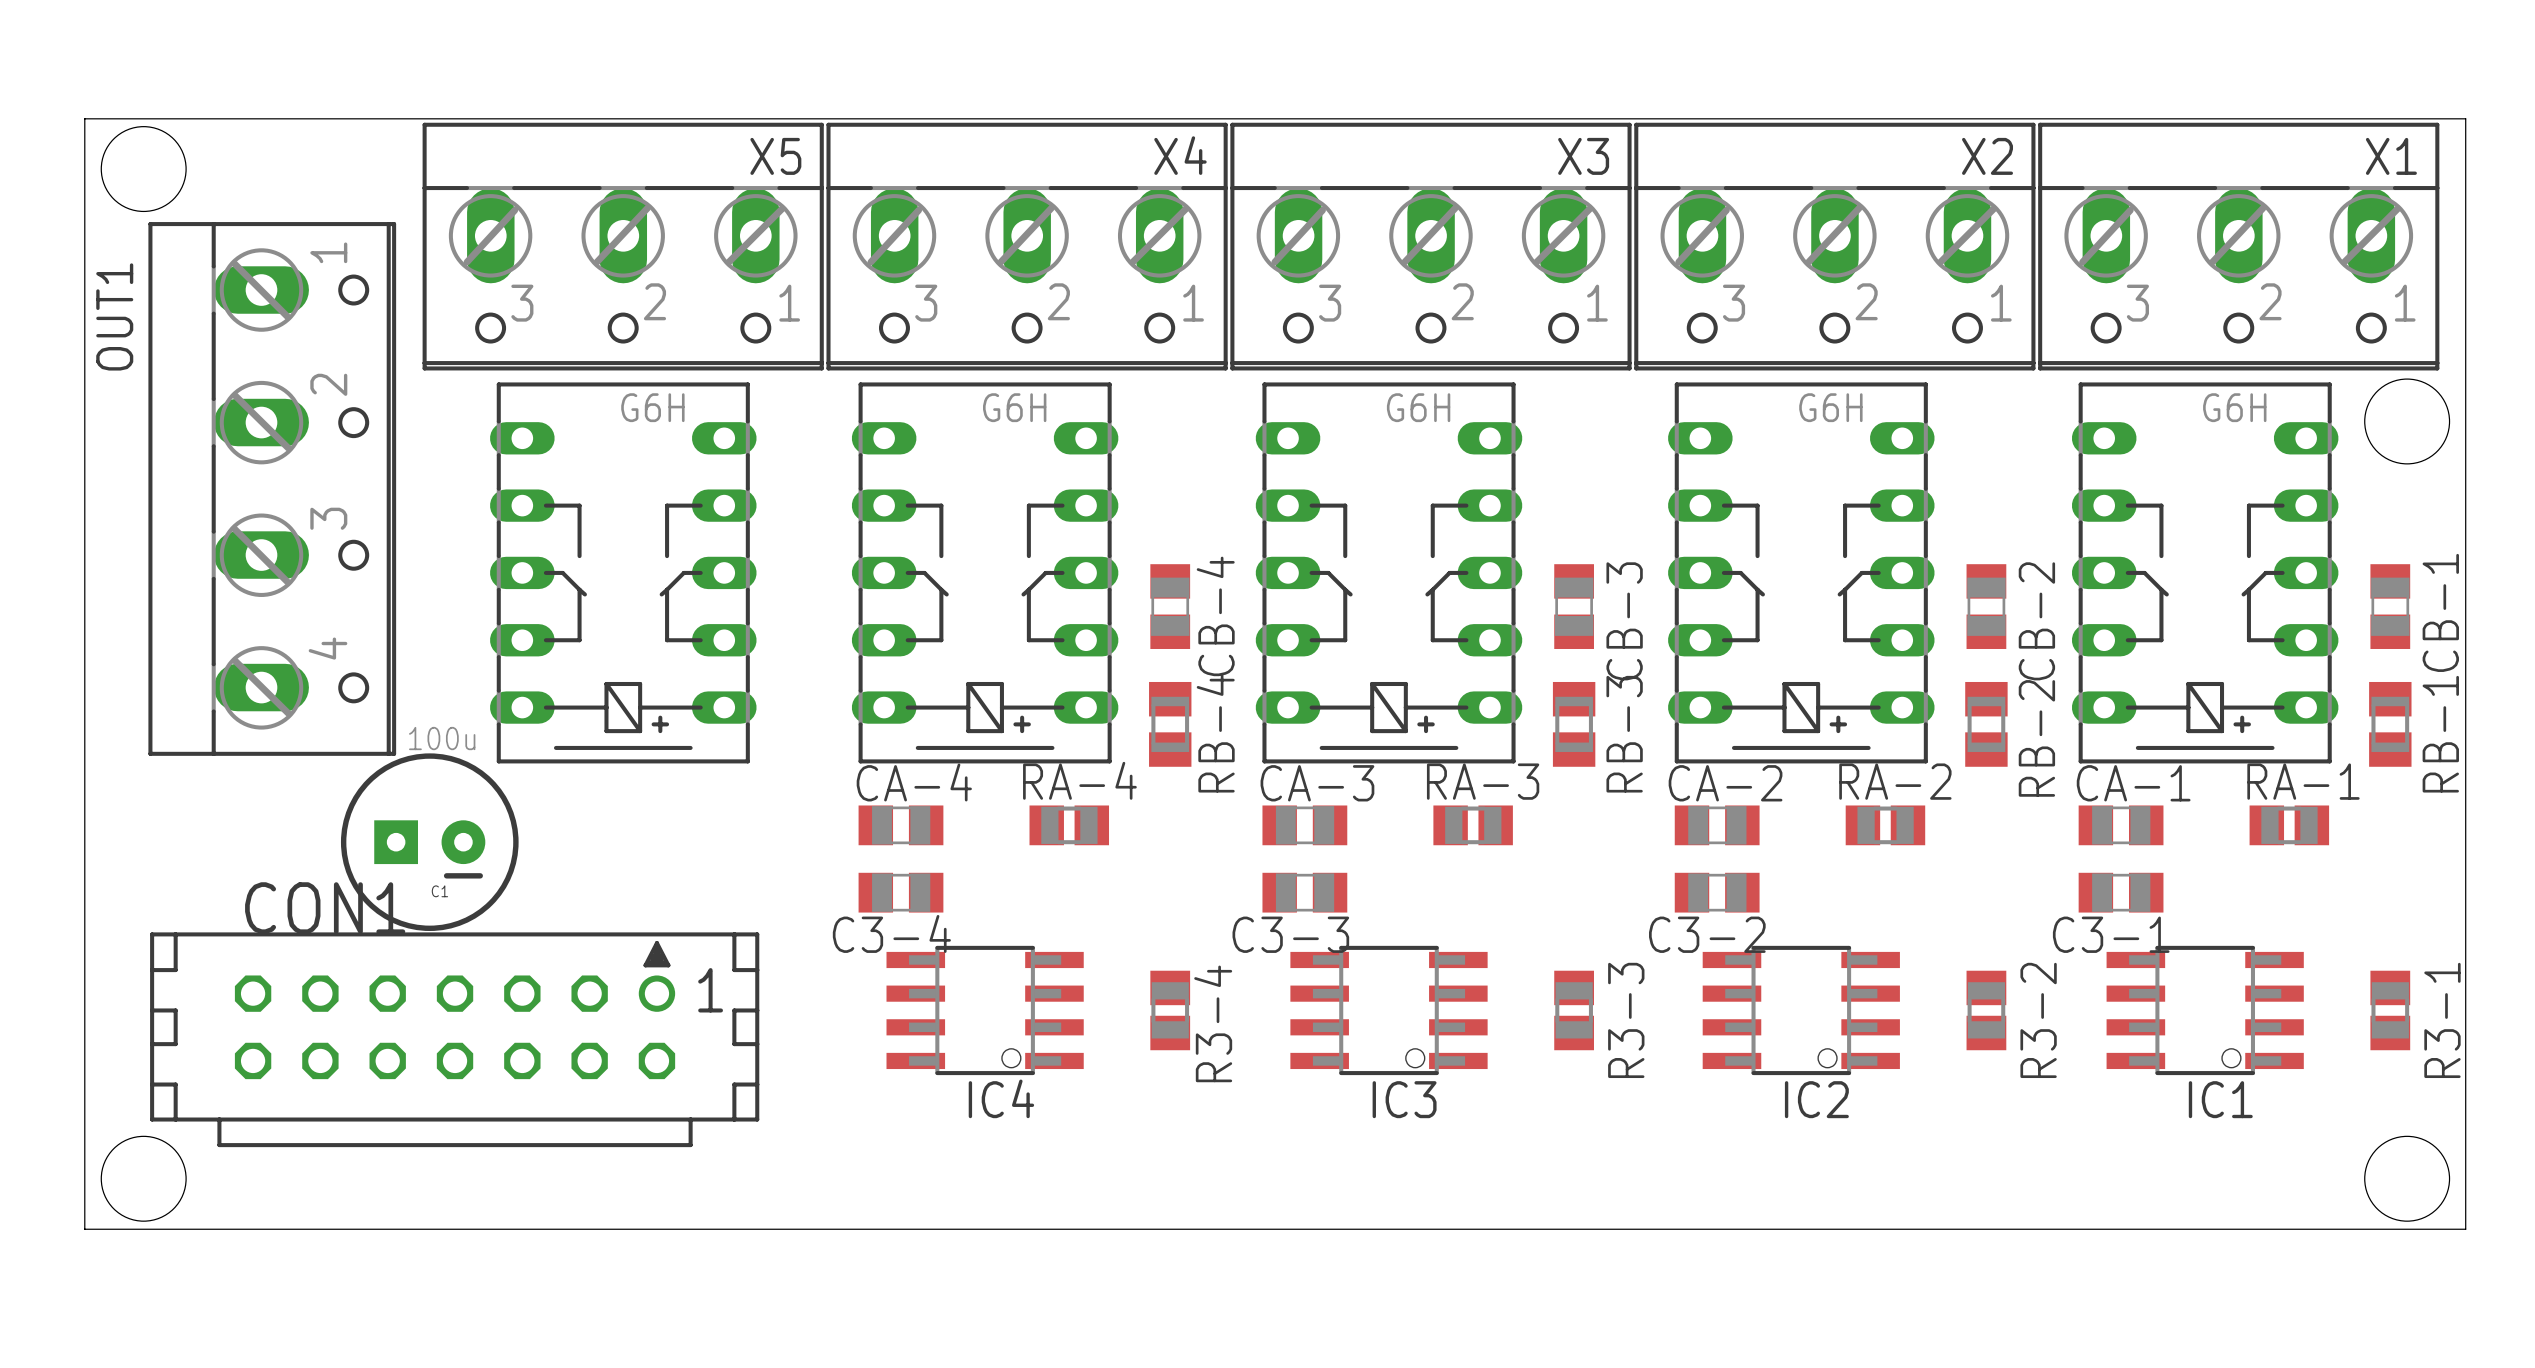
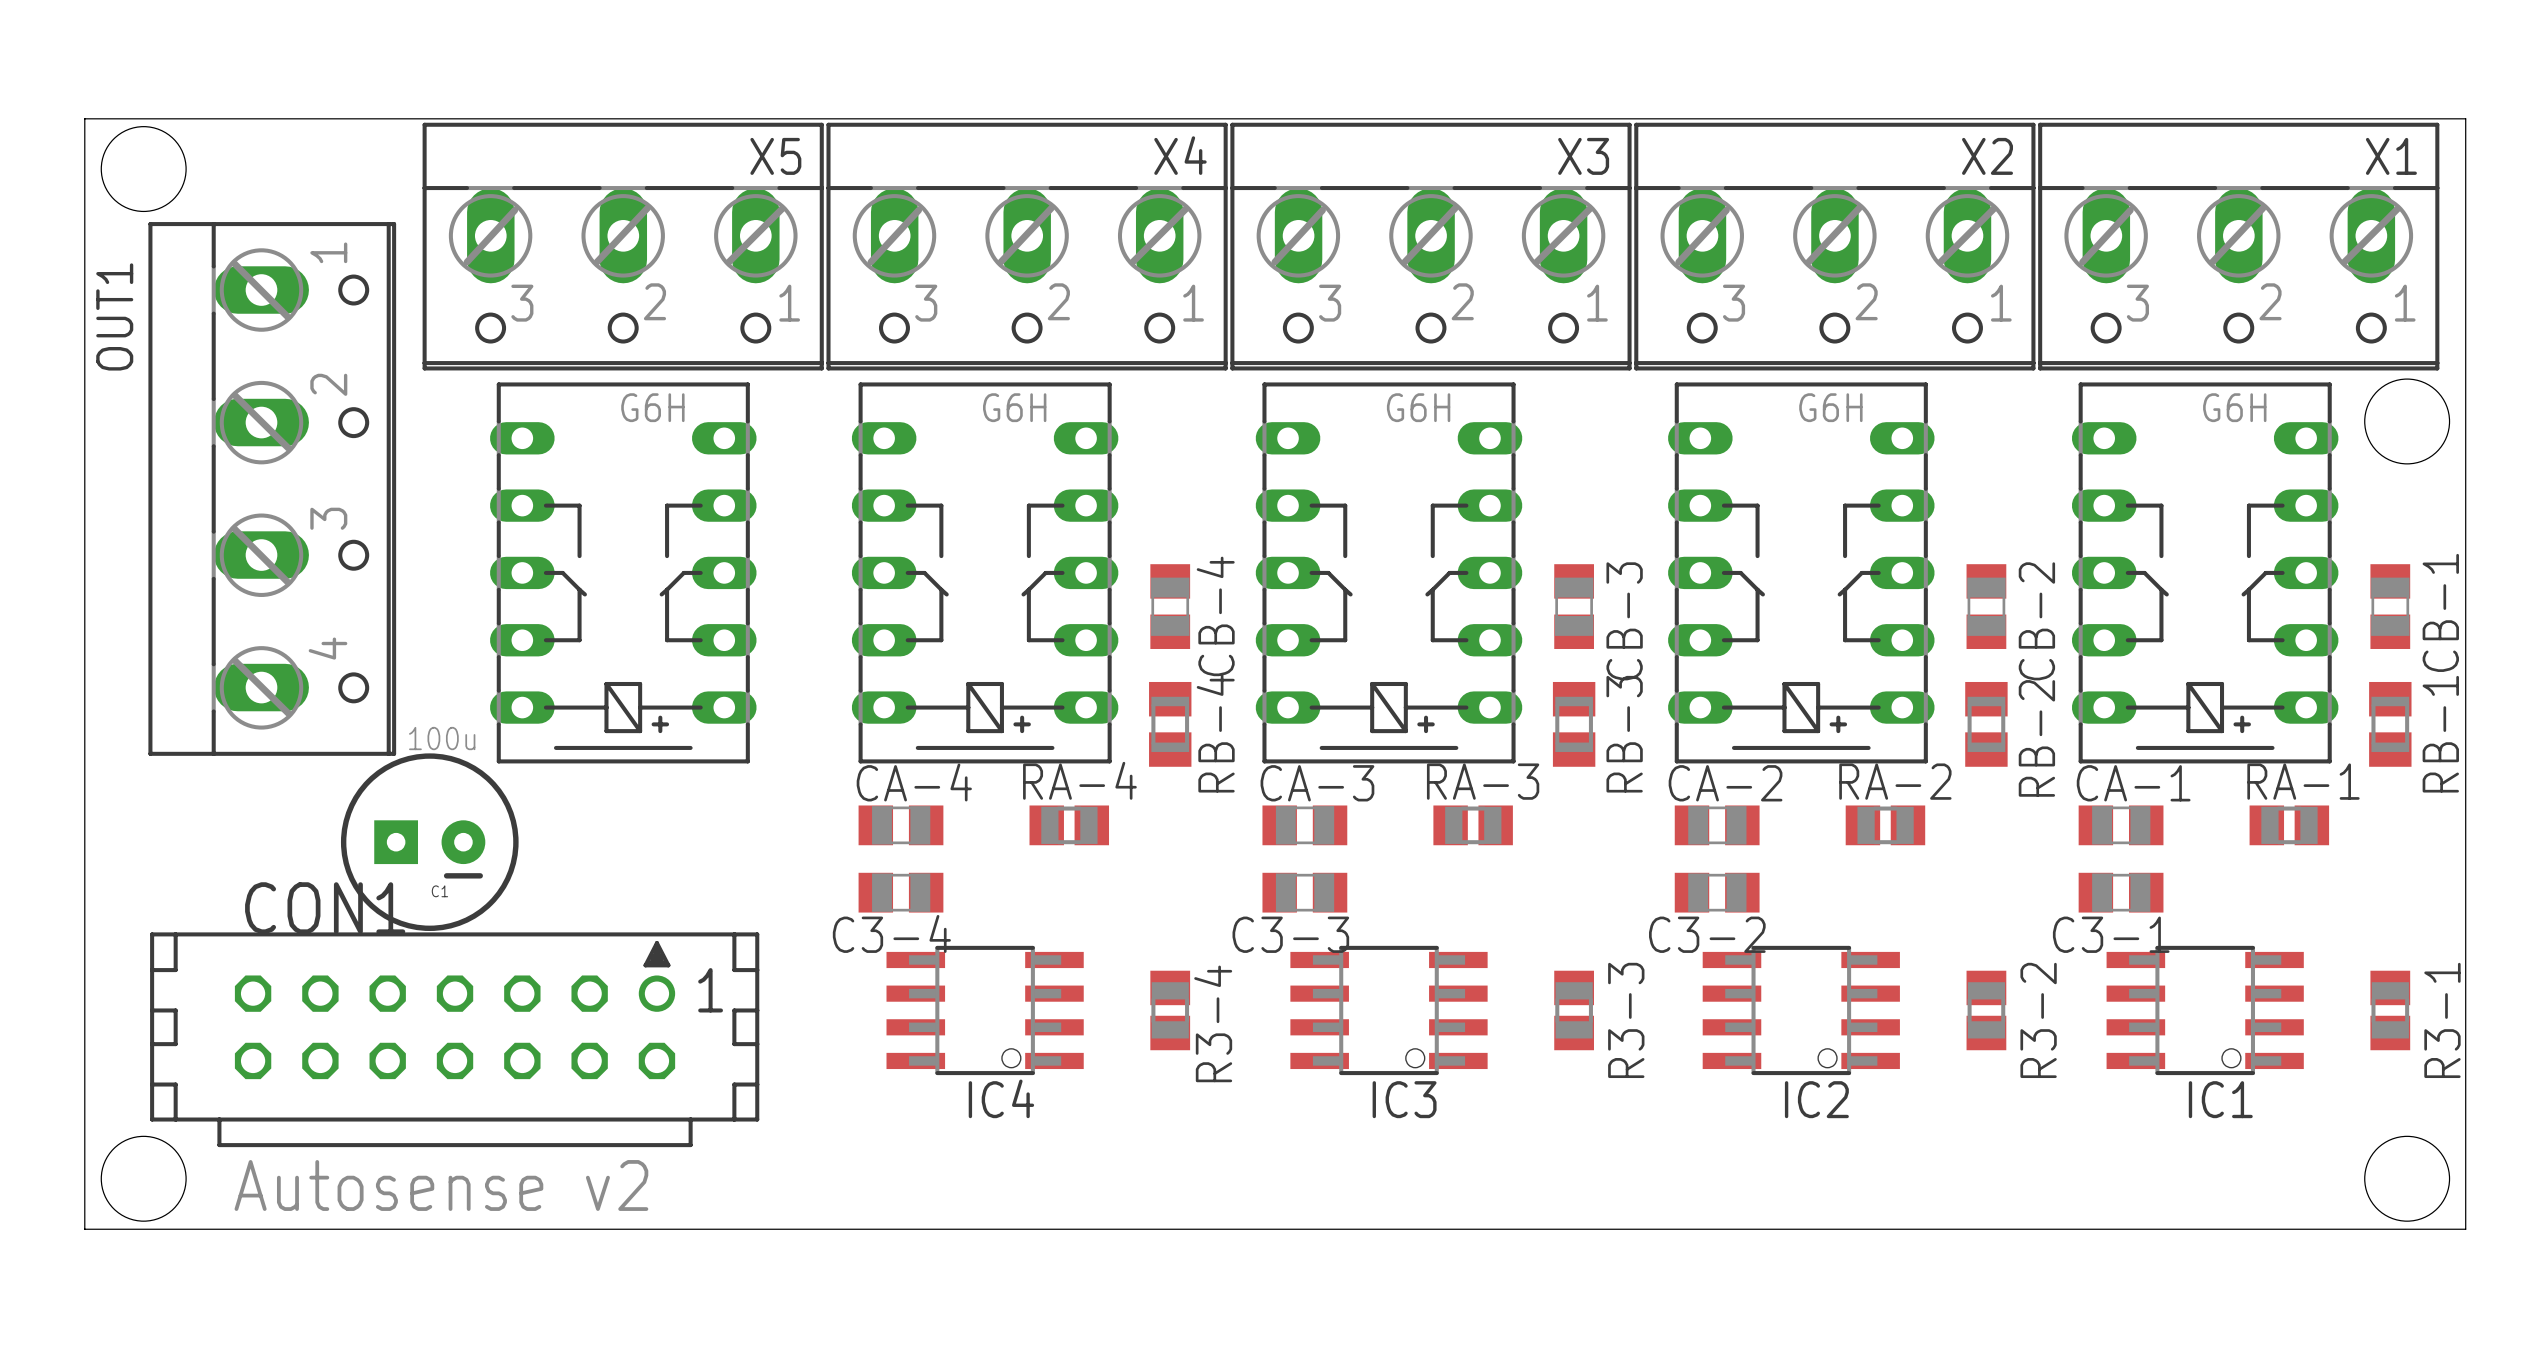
text: none -> Autosense v2 (441, 1185)

